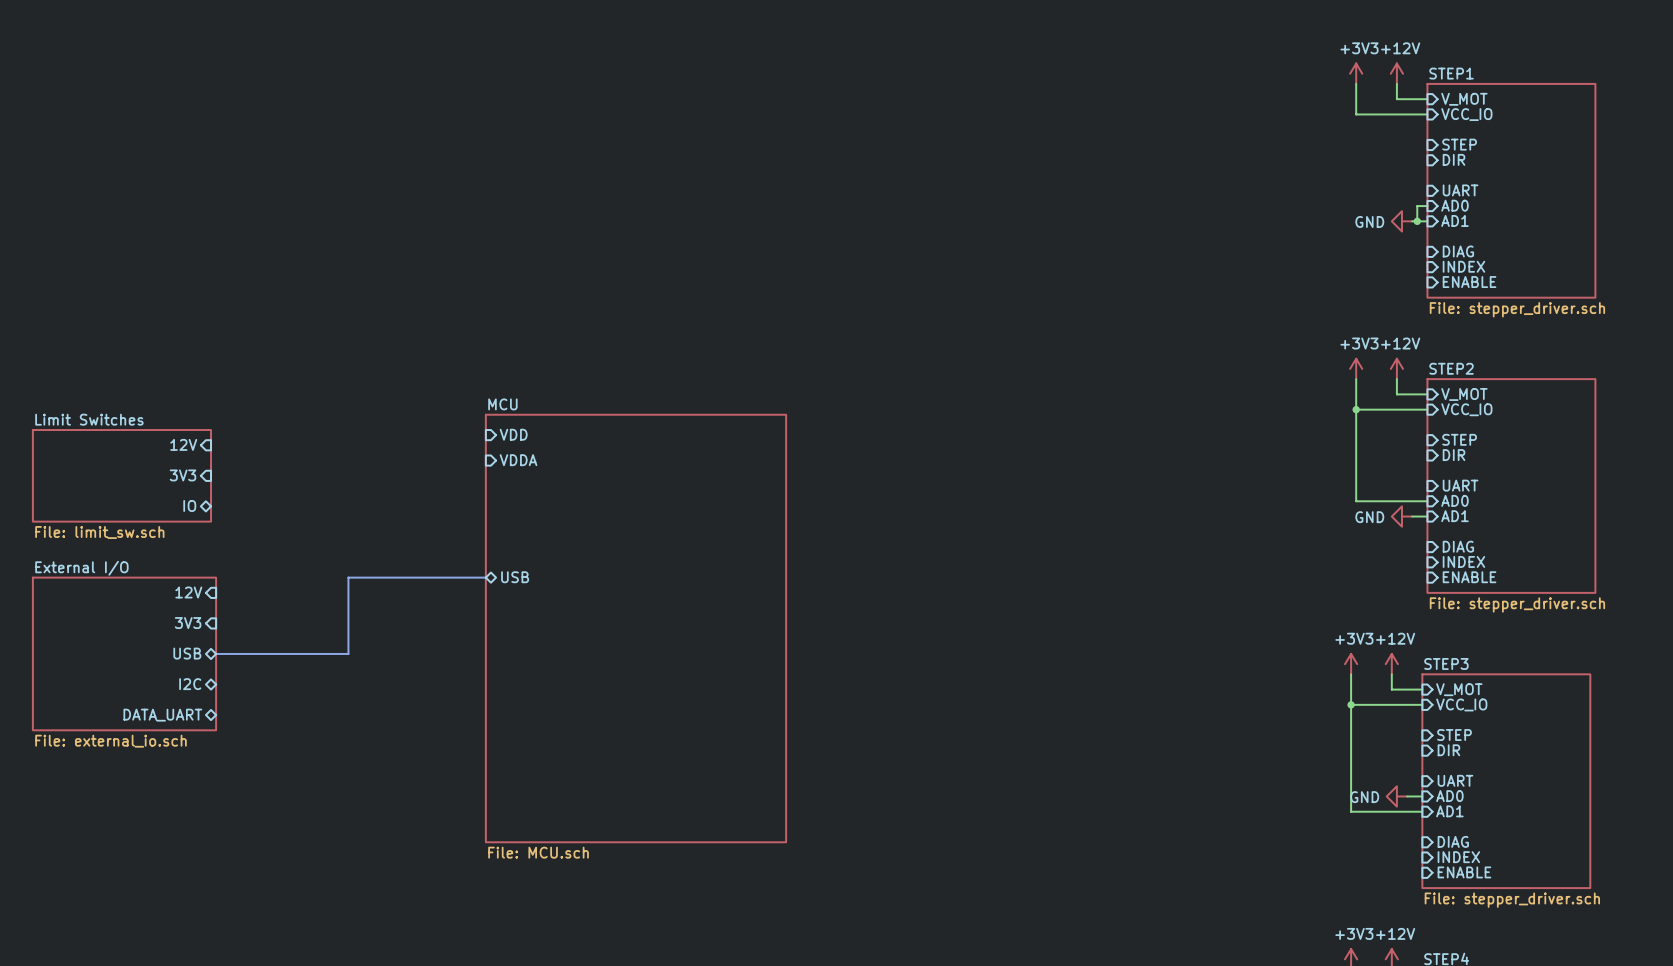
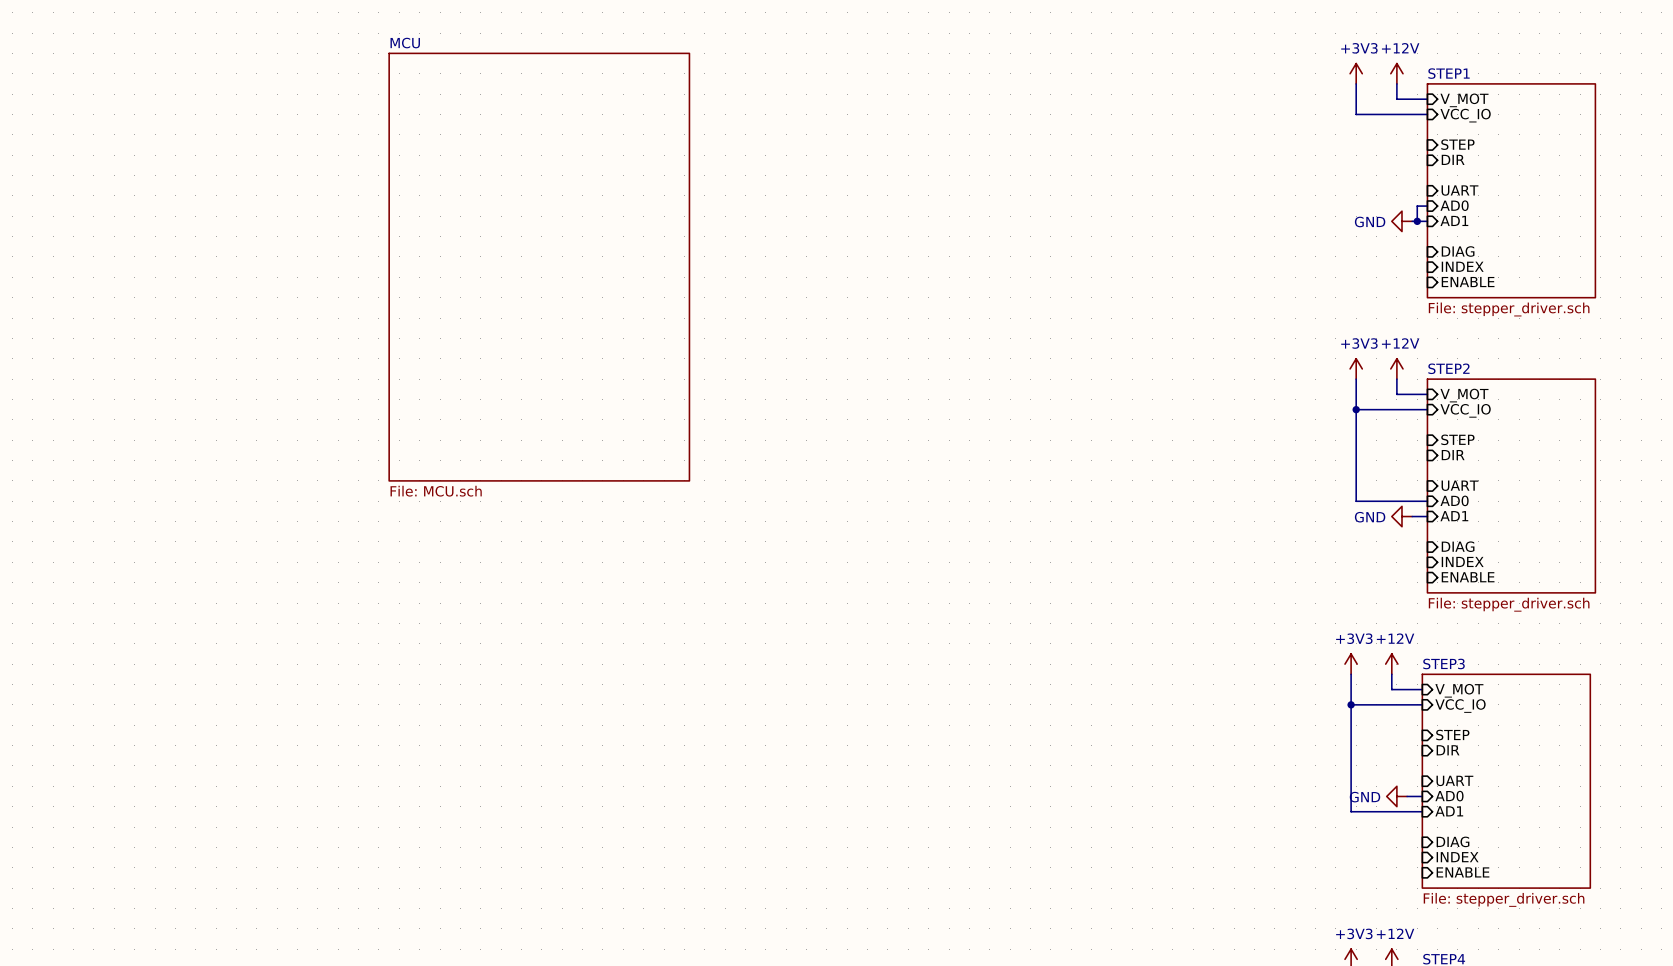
sheet MCU: none -> File: MCU.sch (539, 267)
sheet pin: VDD (513, 434) -> none
sheet pin: 12V (183, 444) -> none
sheet pin: VDDA (518, 460) -> none
sheet Limit Switches: File: limit_sw.sch (121, 475) -> none
sheet pin: 3V3 (182, 475) -> none
sheet pin: IO (189, 505) -> none
bus: (485, 577) (348, 577) (348, 653) (216, 653) -> none
sheet pin: USB (515, 577) -> none
sheet pin: 12V (188, 592) -> none
sheet pin: 3V3 (188, 623) -> none
sheet MCU: File: MCU.sch (636, 628) -> none
sheet External I/O: File: external_io.sch (124, 653) -> none
sheet pin: USB (187, 653) -> none
sheet pin: I2C (190, 684) -> none
sheet pin: DATA_UART (162, 715) -> none

